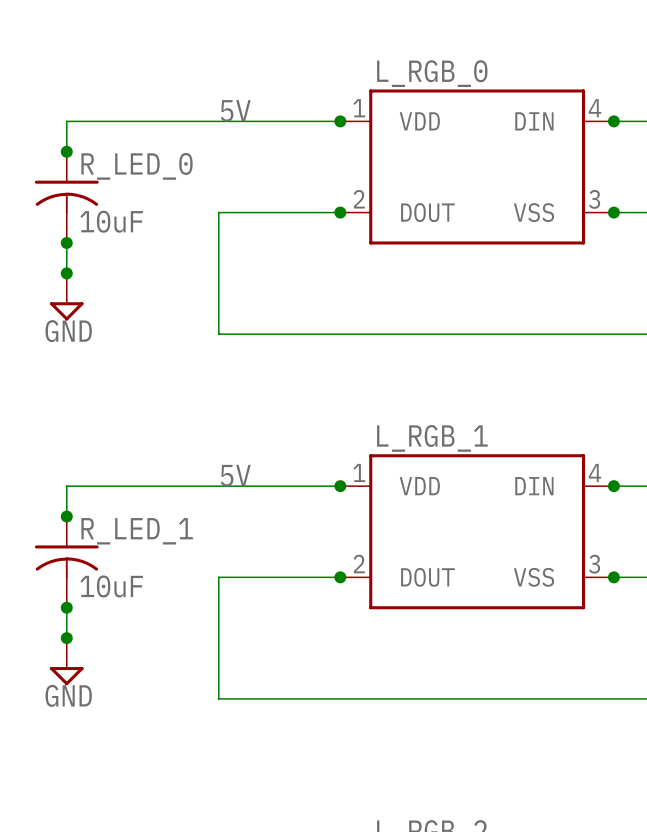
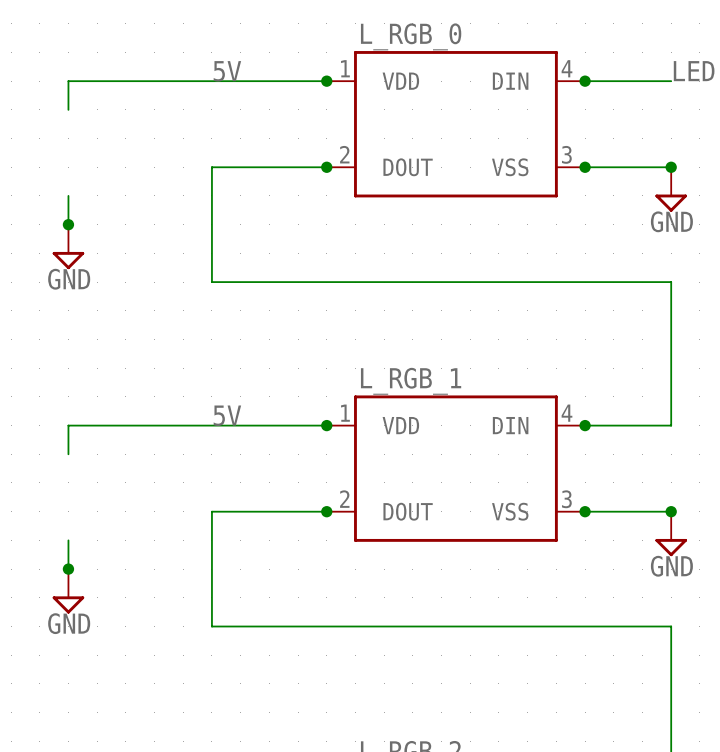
junction: (66, 151) -> none
R_LED_0: 10uF (66, 197) -> none
junction: (66, 242) -> none
junction: (66, 516) -> none
R_LED_1: 10uF (66, 562) -> none
junction: (66, 607) -> none

